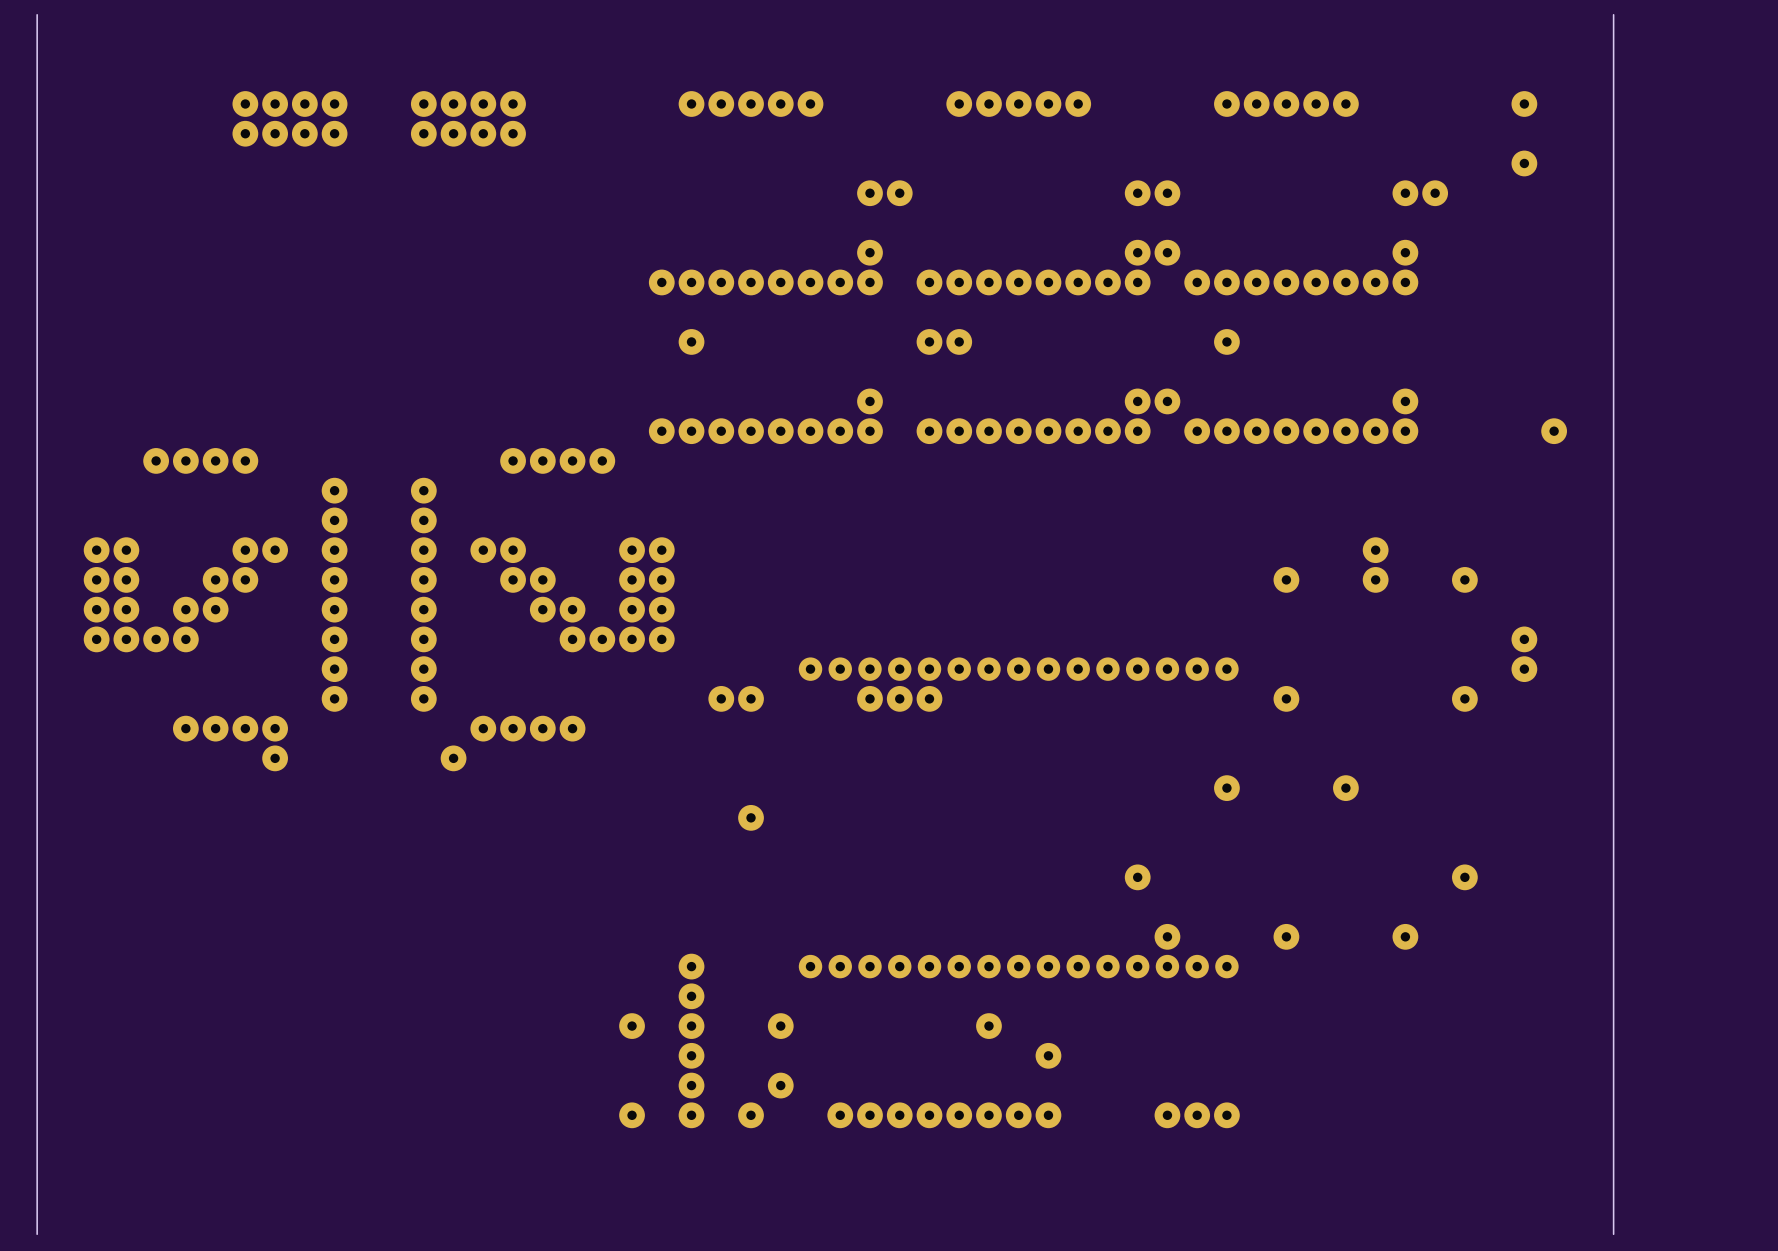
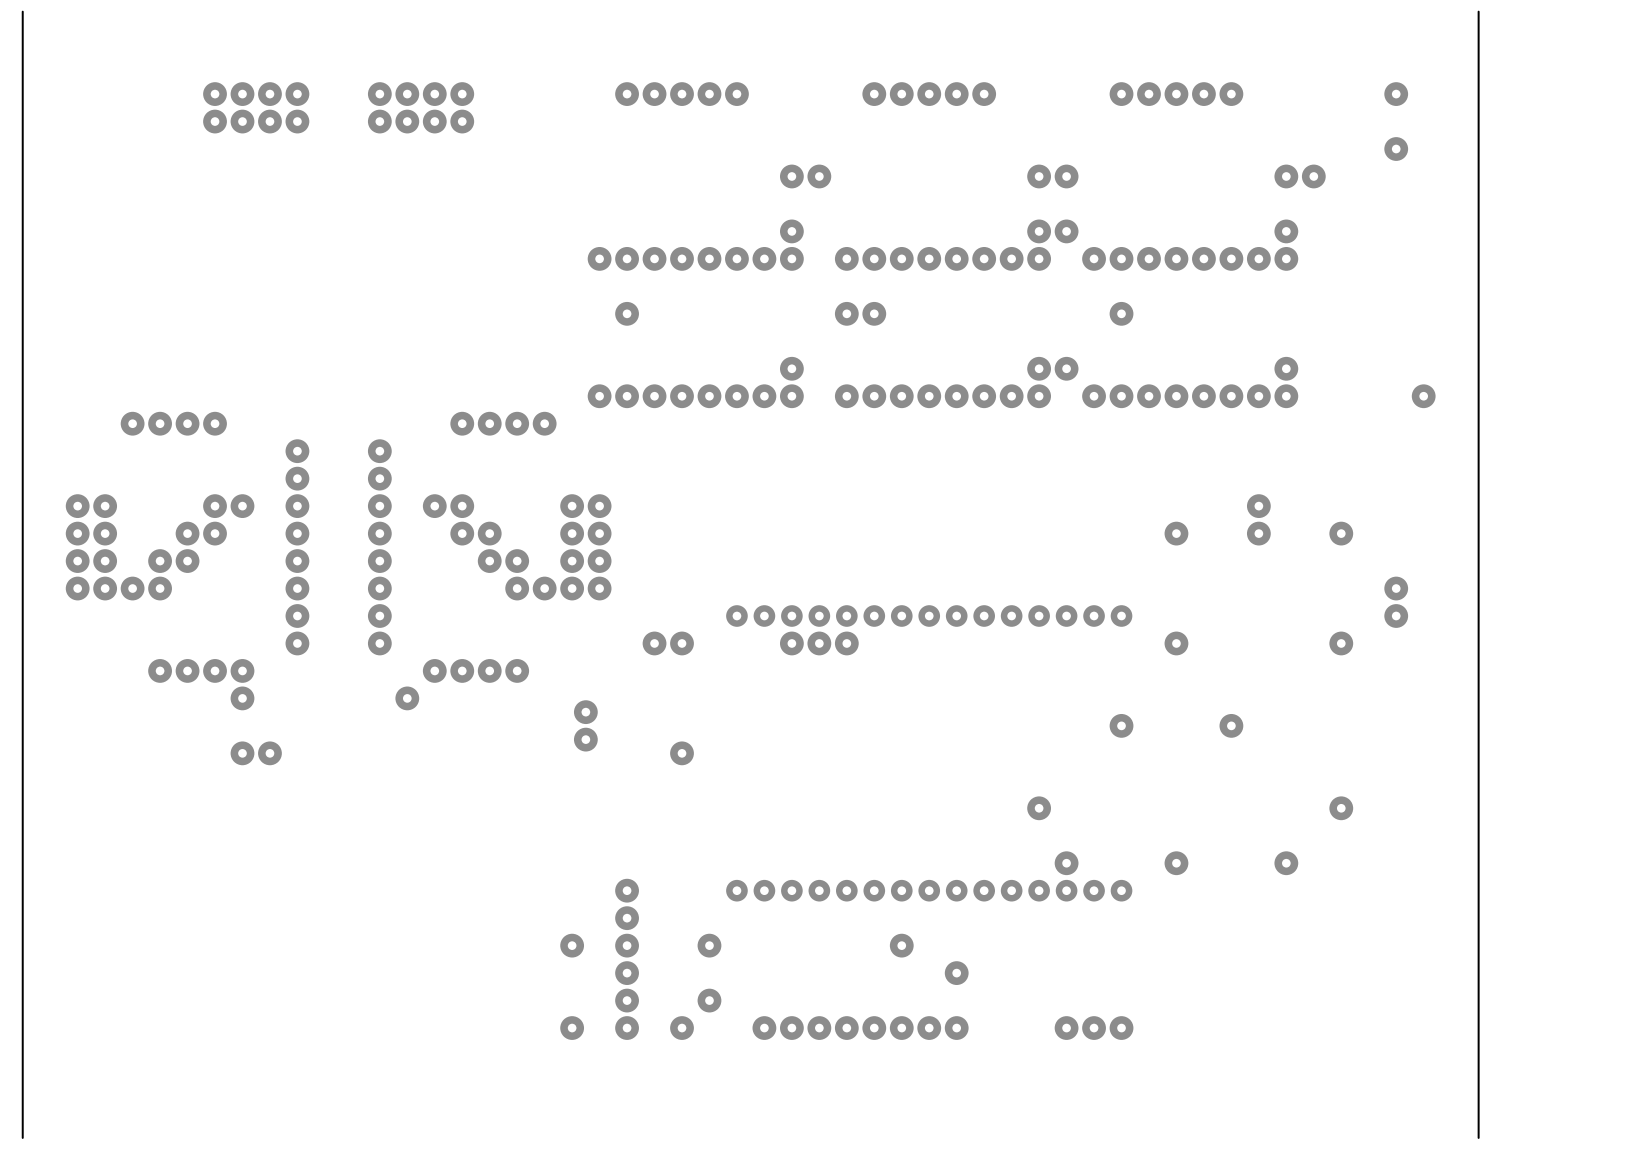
part: none -> (585, 712)
part: none -> (585, 739)
part: none -> (256, 753)

